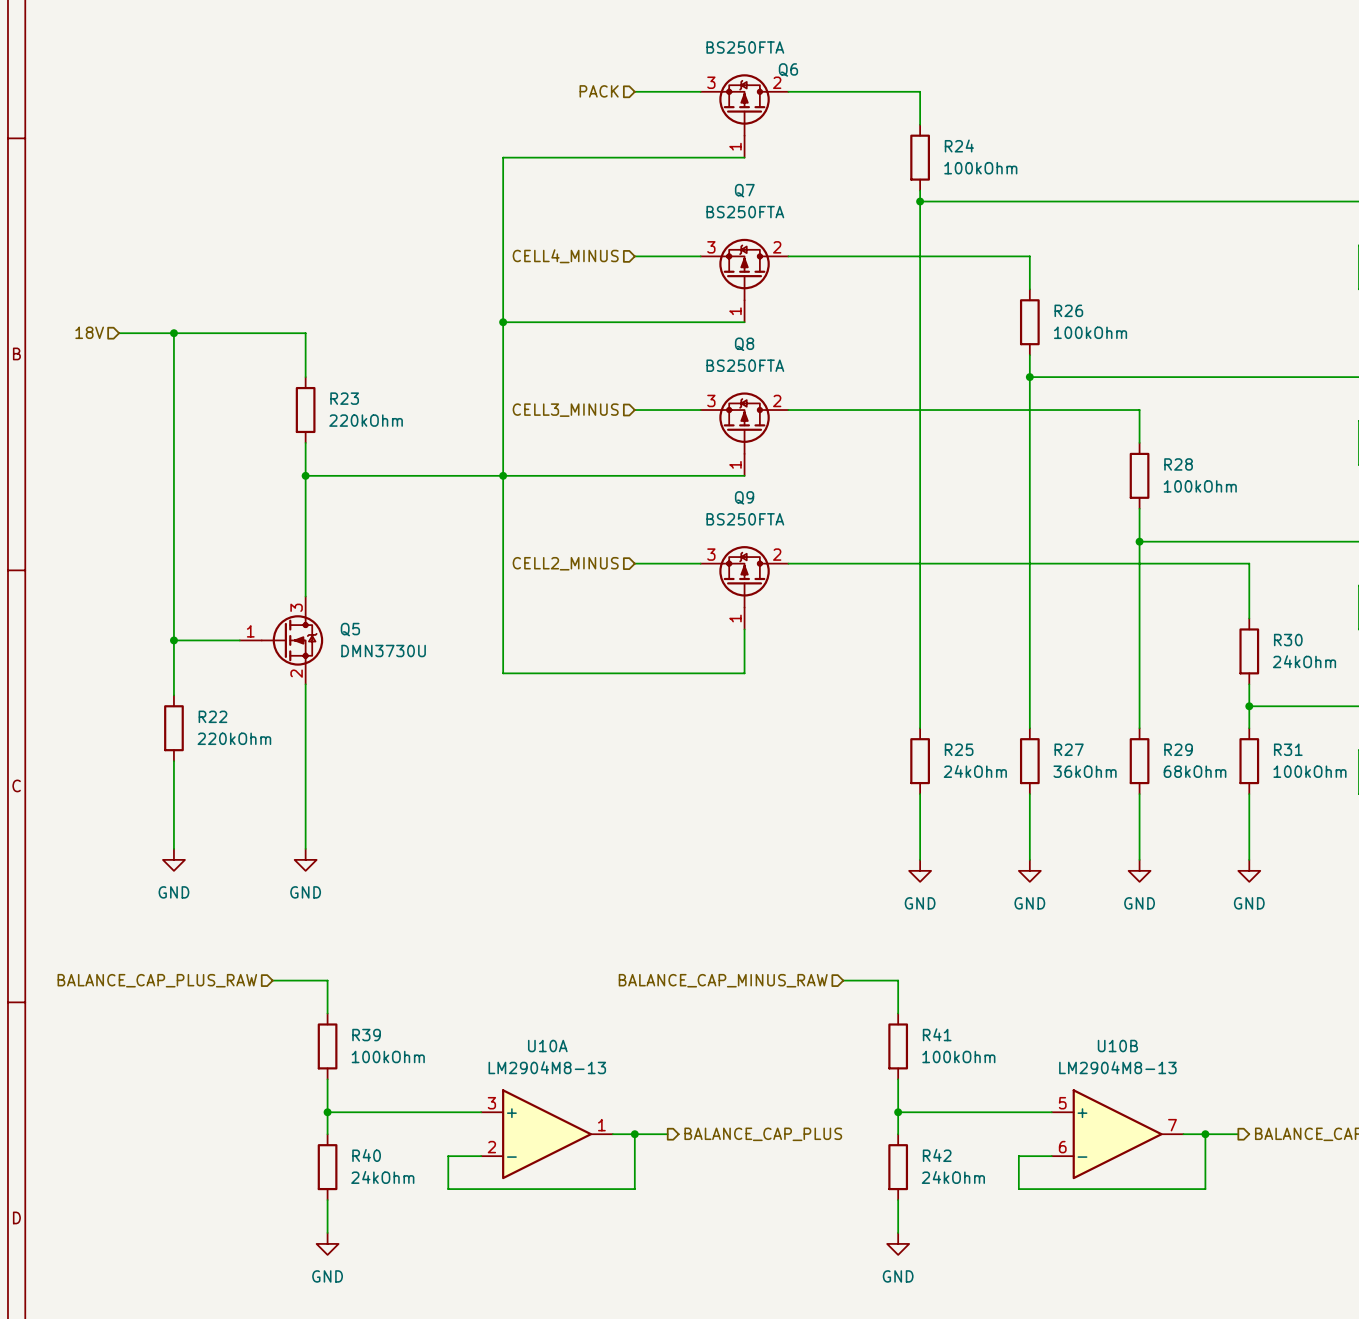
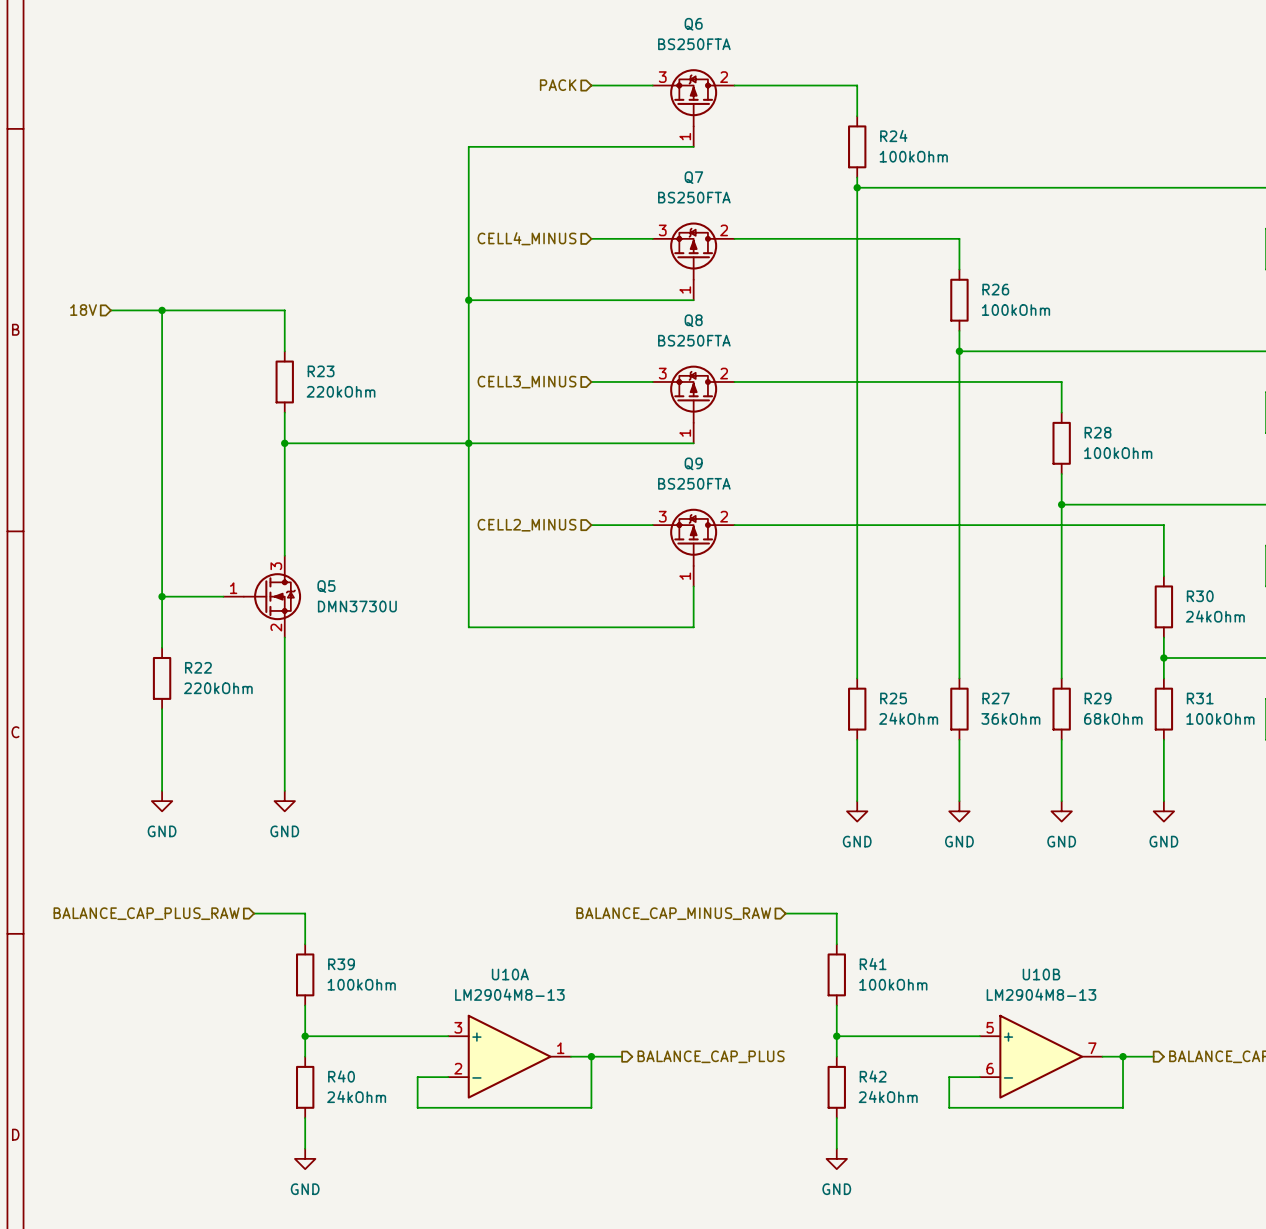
Q6 name position: Q6 (788, 69) -> Q6 (693, 24)

